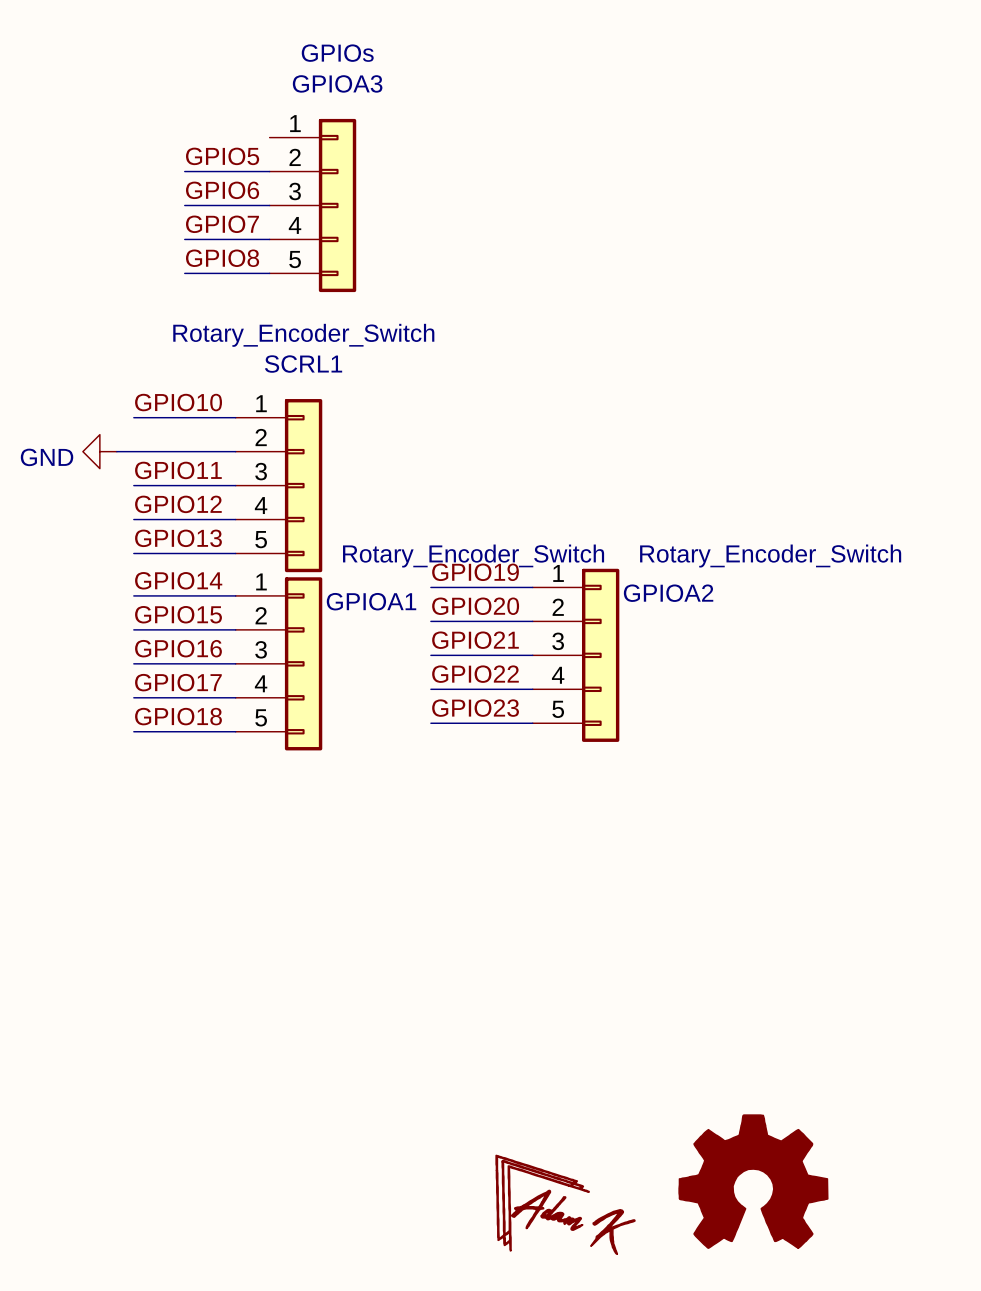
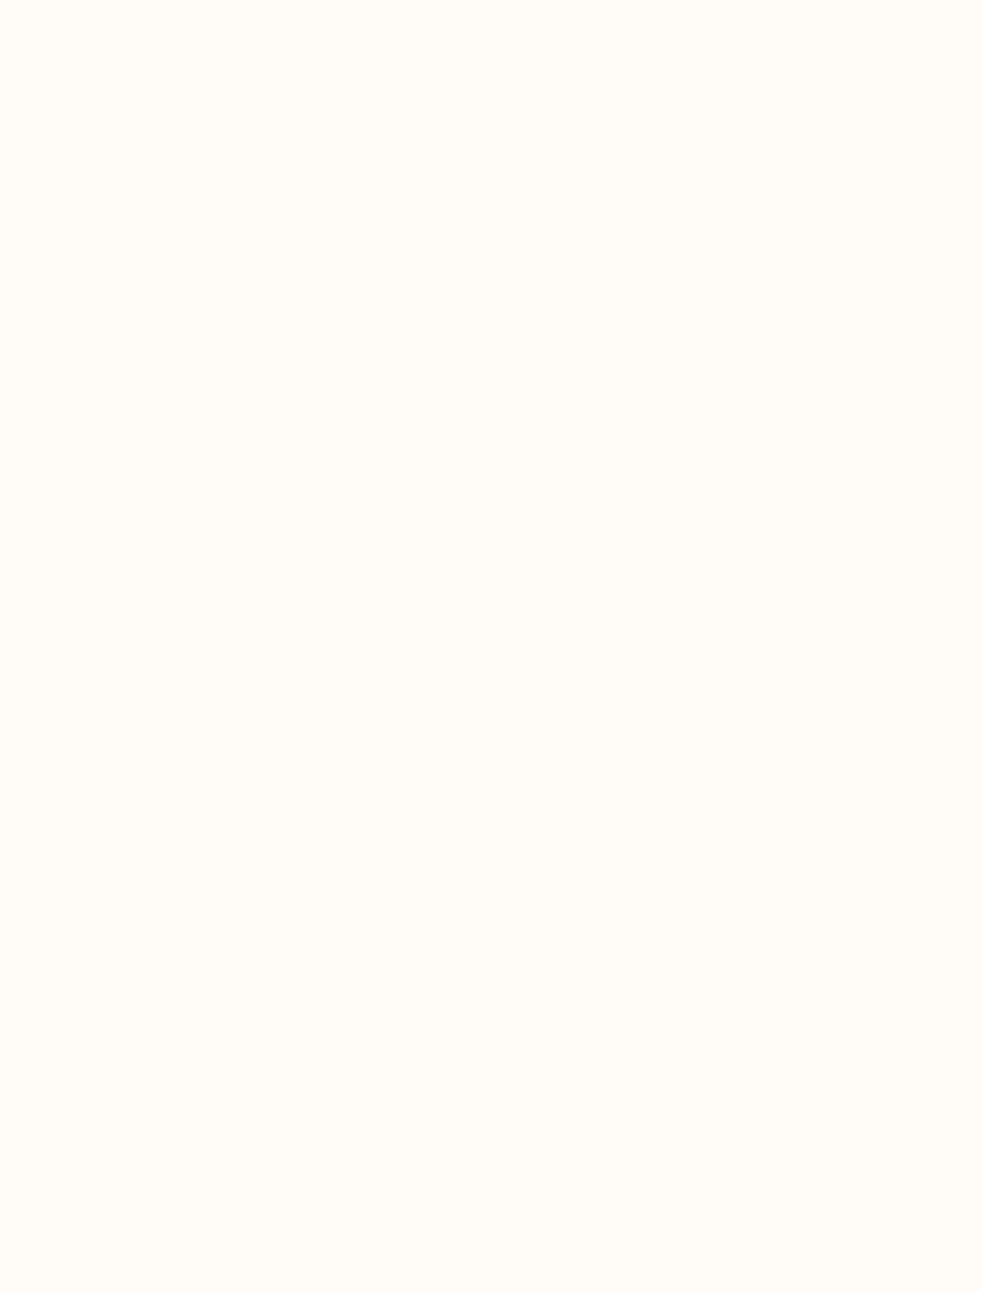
label: GPIO5 (222, 156) -> none
wire: (184, 171) (269, 171) -> none
label: GPIO6 (222, 190) -> none
wire: (184, 205) (269, 205) -> none
GPIOA3: GPIOs (312, 205) -> none
label: GPIO7 (222, 224) -> none
wire: (184, 239) (269, 239) -> none
label: GPIO8 (222, 258) -> none
wire: (184, 273) (269, 273) -> none
label: GPIO10 (178, 402) -> none
wire: (133, 417) (235, 417) -> none
power symbol: GND (99, 451) -> none
wire: (116, 451) (235, 451) -> none
label: GPIO11 (178, 470) -> none
wire: (133, 485) (235, 485) -> none
SCRL1: Rotary_Encoder_Switch (278, 485) -> none
label: GPIO12 (178, 504) -> none
wire: (133, 519) (235, 519) -> none
label: GPIO13 (178, 538) -> none
wire: (133, 553) (235, 553) -> none
label: GPIO19 (475, 572) -> none
label: GPIO14 (178, 580) -> none
wire: (430, 587) (532, 587) -> none
wire: (133, 595) (235, 595) -> none
label: GPIO20 (475, 606) -> none
label: GPIO15 (178, 614) -> none
wire: (430, 621) (532, 621) -> none
wire: (133, 629) (235, 629) -> none
label: GPIO21 (475, 640) -> none
label: GPIO16 (178, 648) -> none
wire: (430, 655) (532, 655) -> none
GPIOA2: Rotary_Encoder_Switch (576, 655) -> none
wire: (133, 663) (235, 663) -> none
GPIOA1: Rotary_Encoder_Switch (278, 663) -> none
label: GPIO22 (475, 674) -> none
label: GPIO17 (178, 682) -> none
wire: (430, 689) (532, 689) -> none
wire: (133, 697) (235, 697) -> none
label: GPIO23 (475, 708) -> none
label: GPIO18 (178, 716) -> none
wire: (430, 723) (532, 723) -> none
wire: (133, 731) (235, 731) -> none
power symbol: (753, 1181) -> none
power symbol: (565, 1204) -> none

